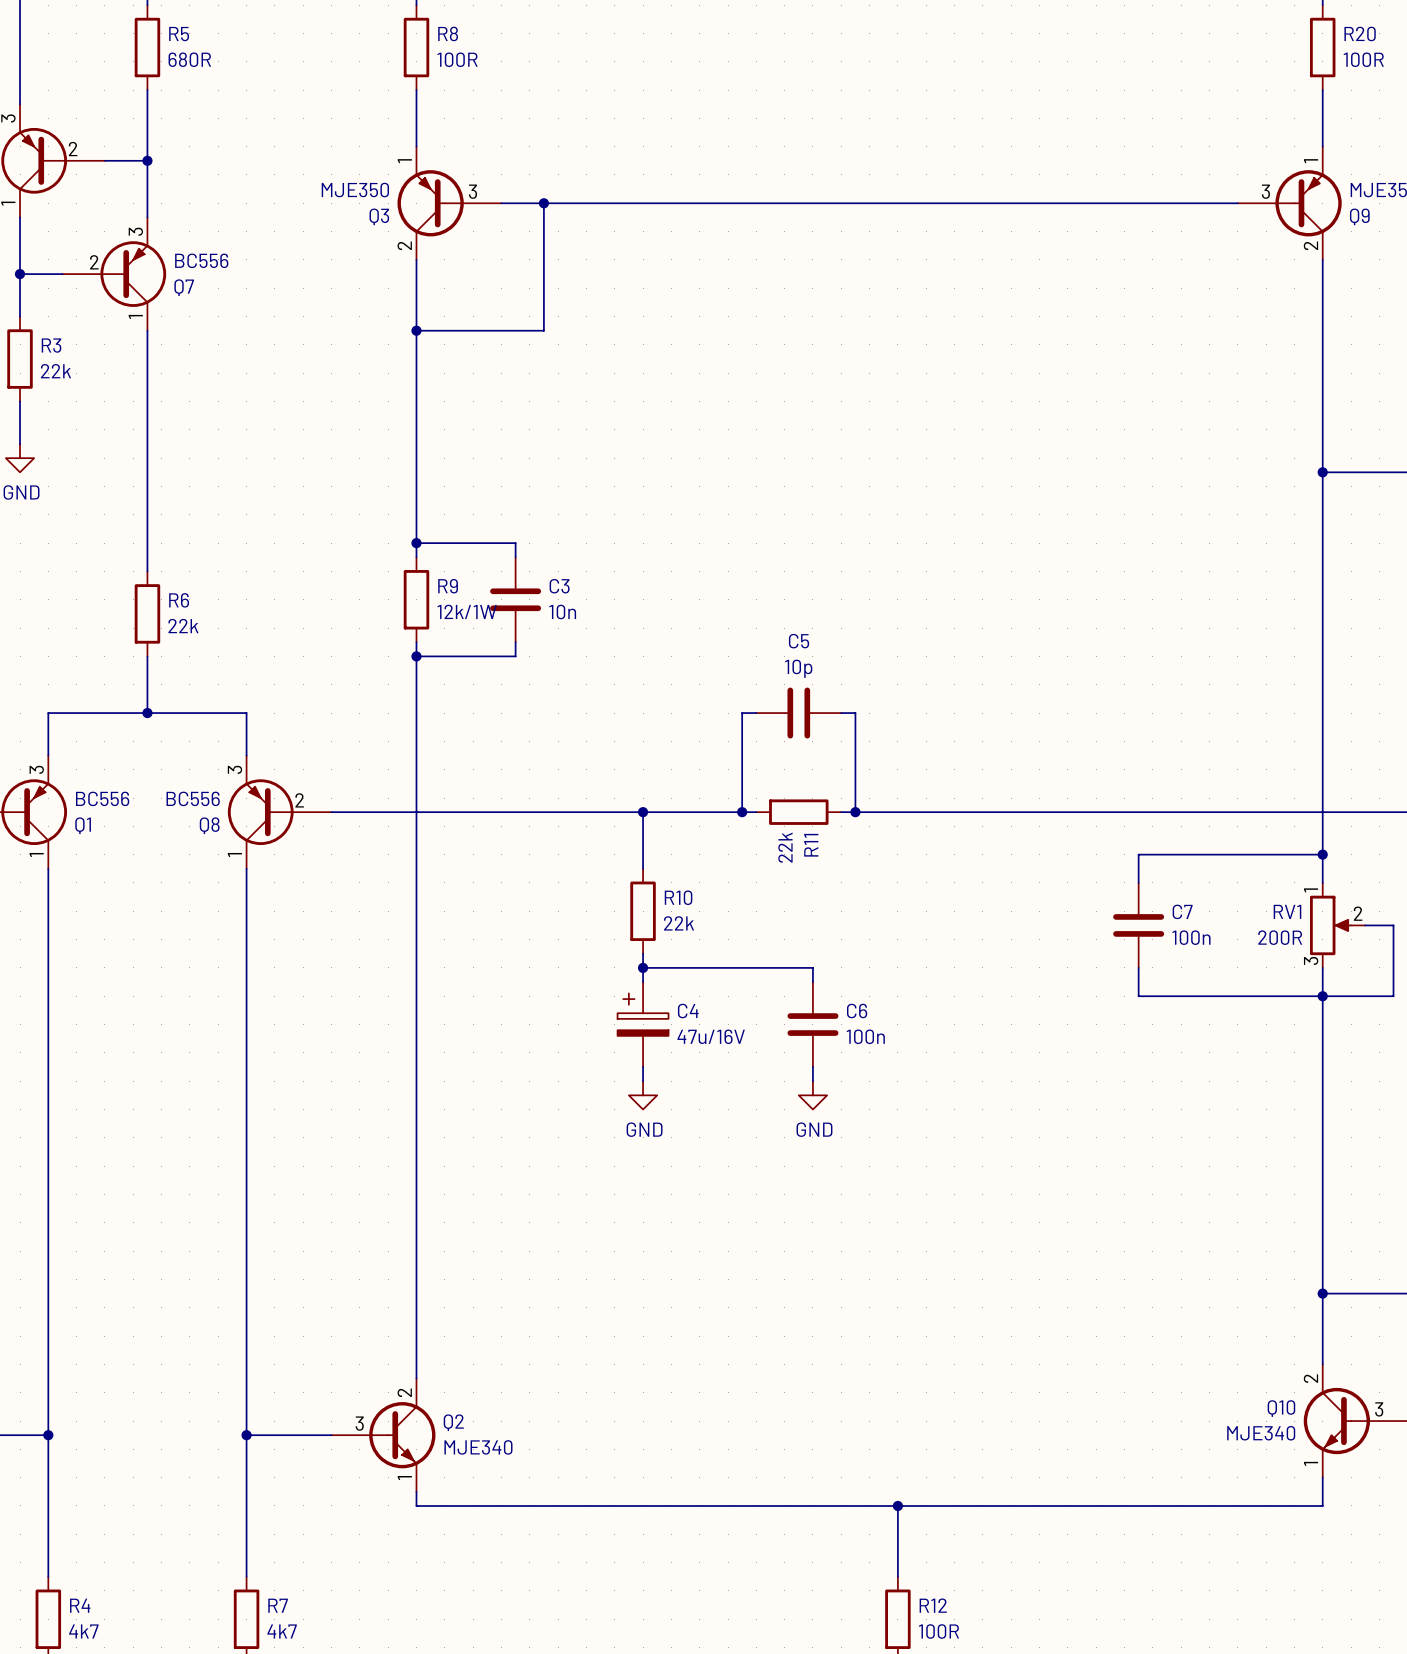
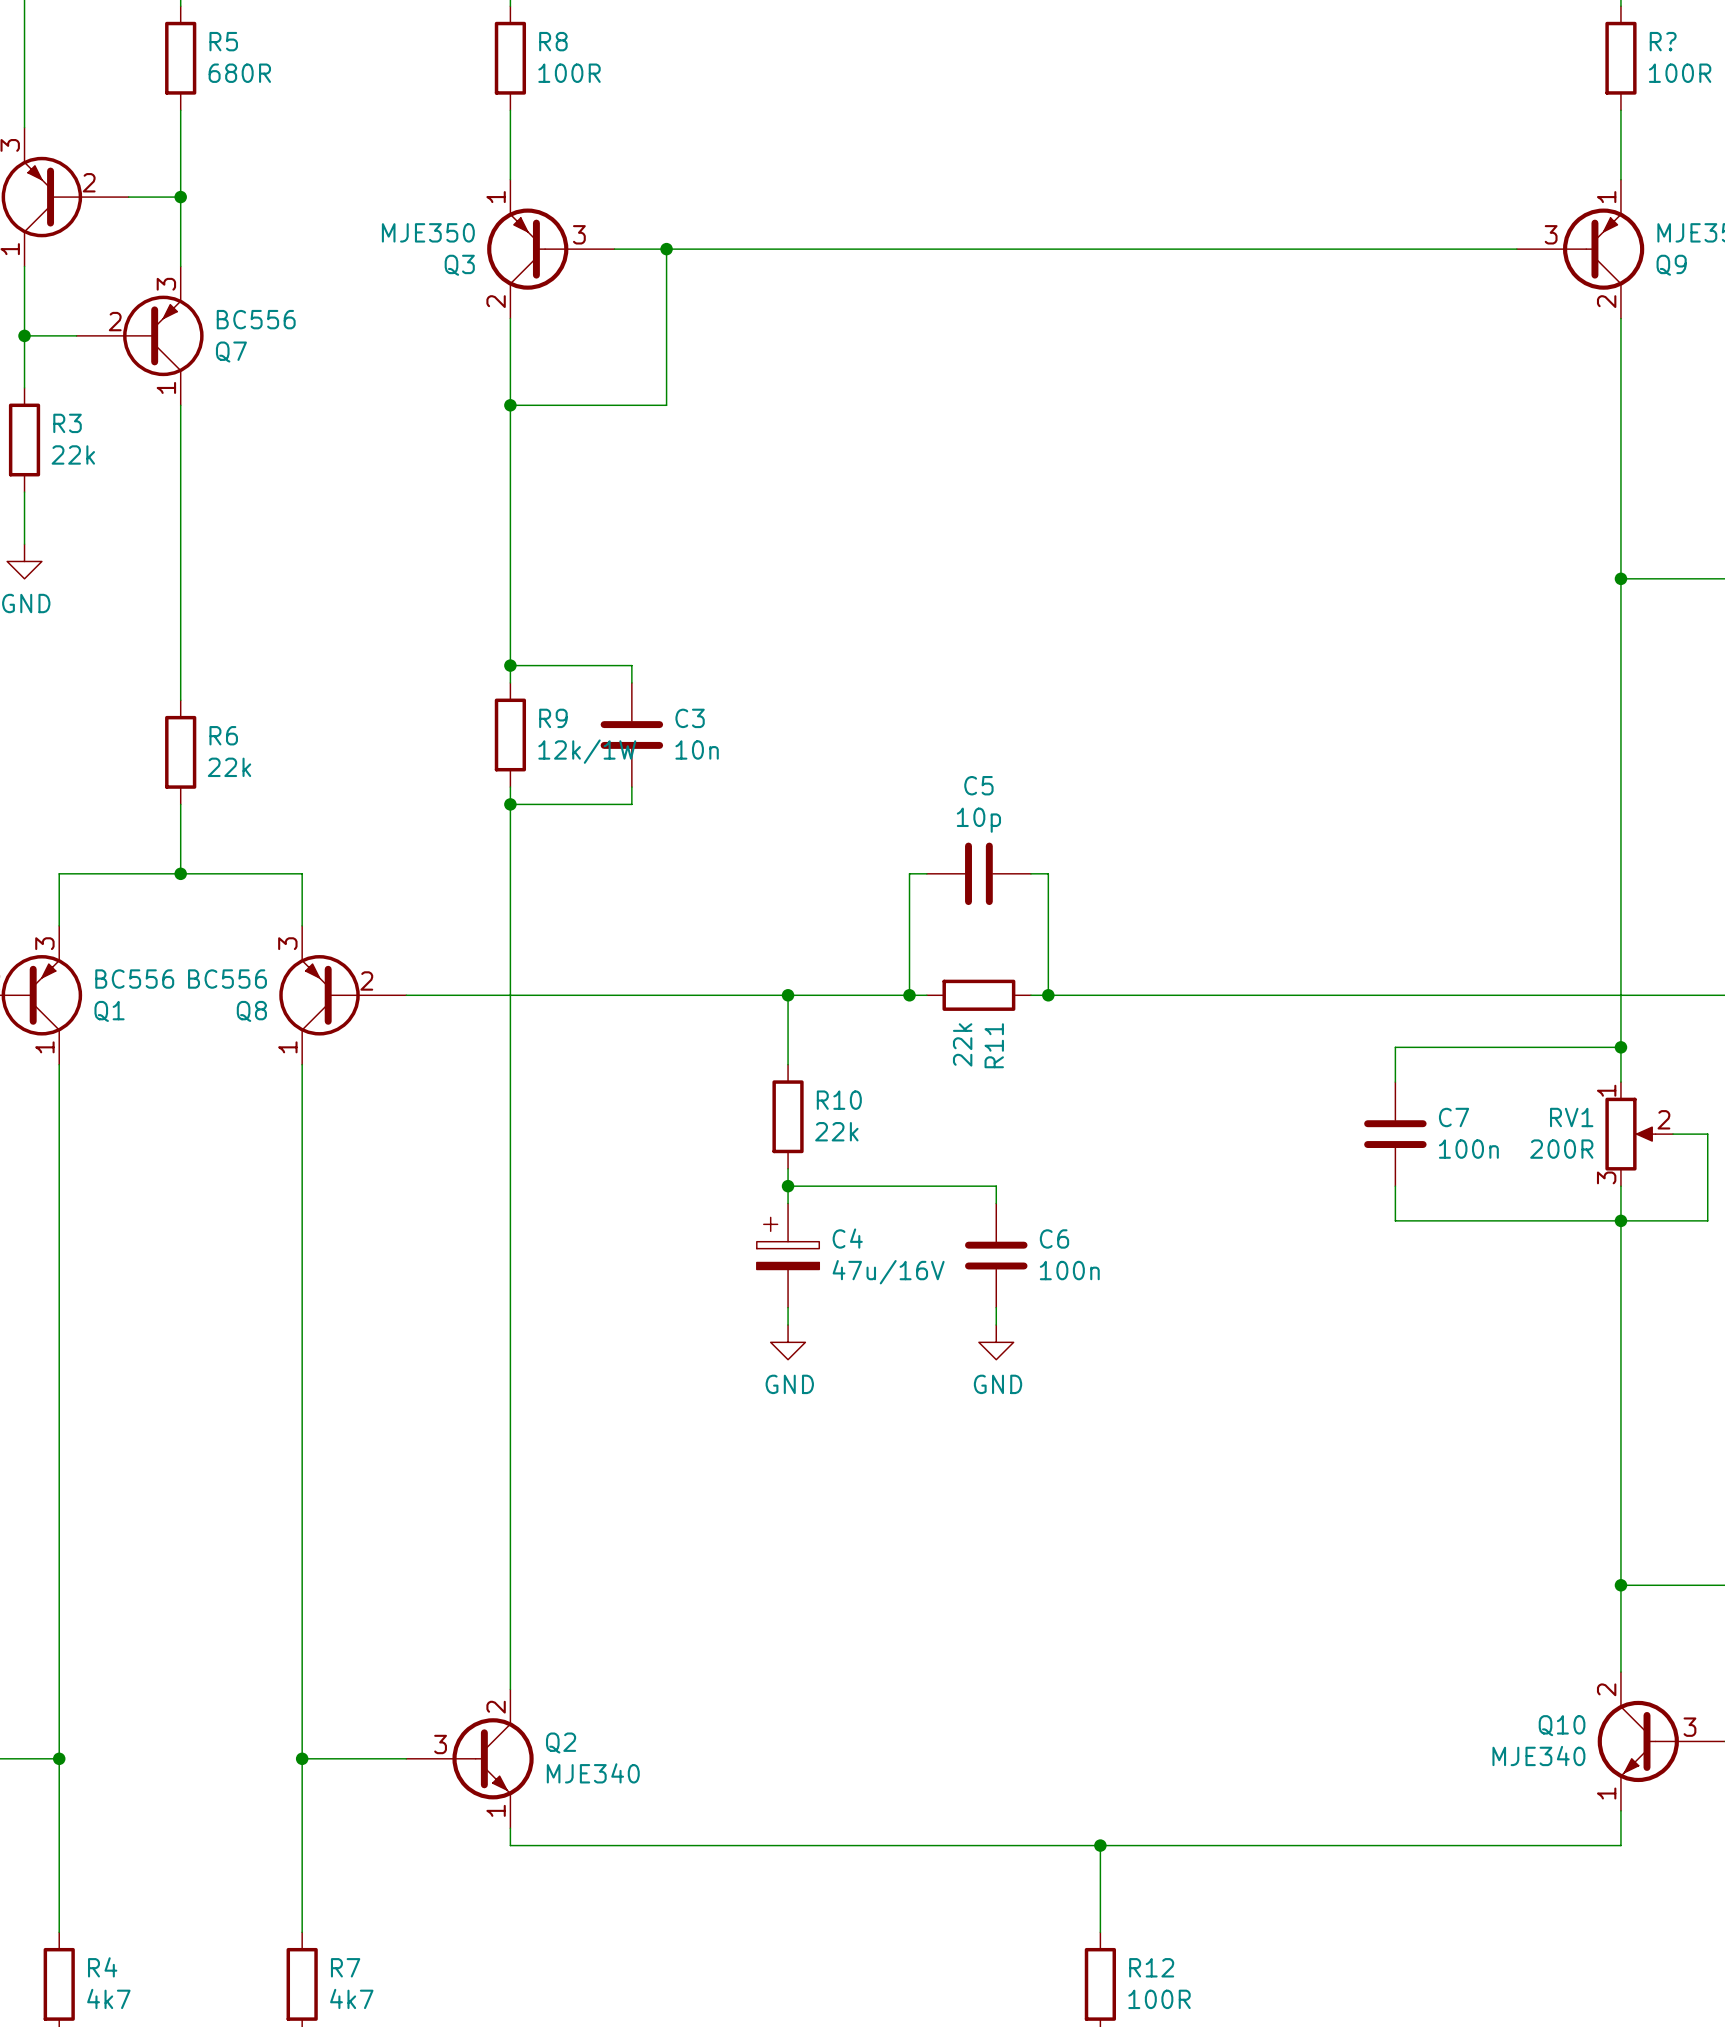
R20 name: R20 (1360, 33) -> R? (1663, 41)

